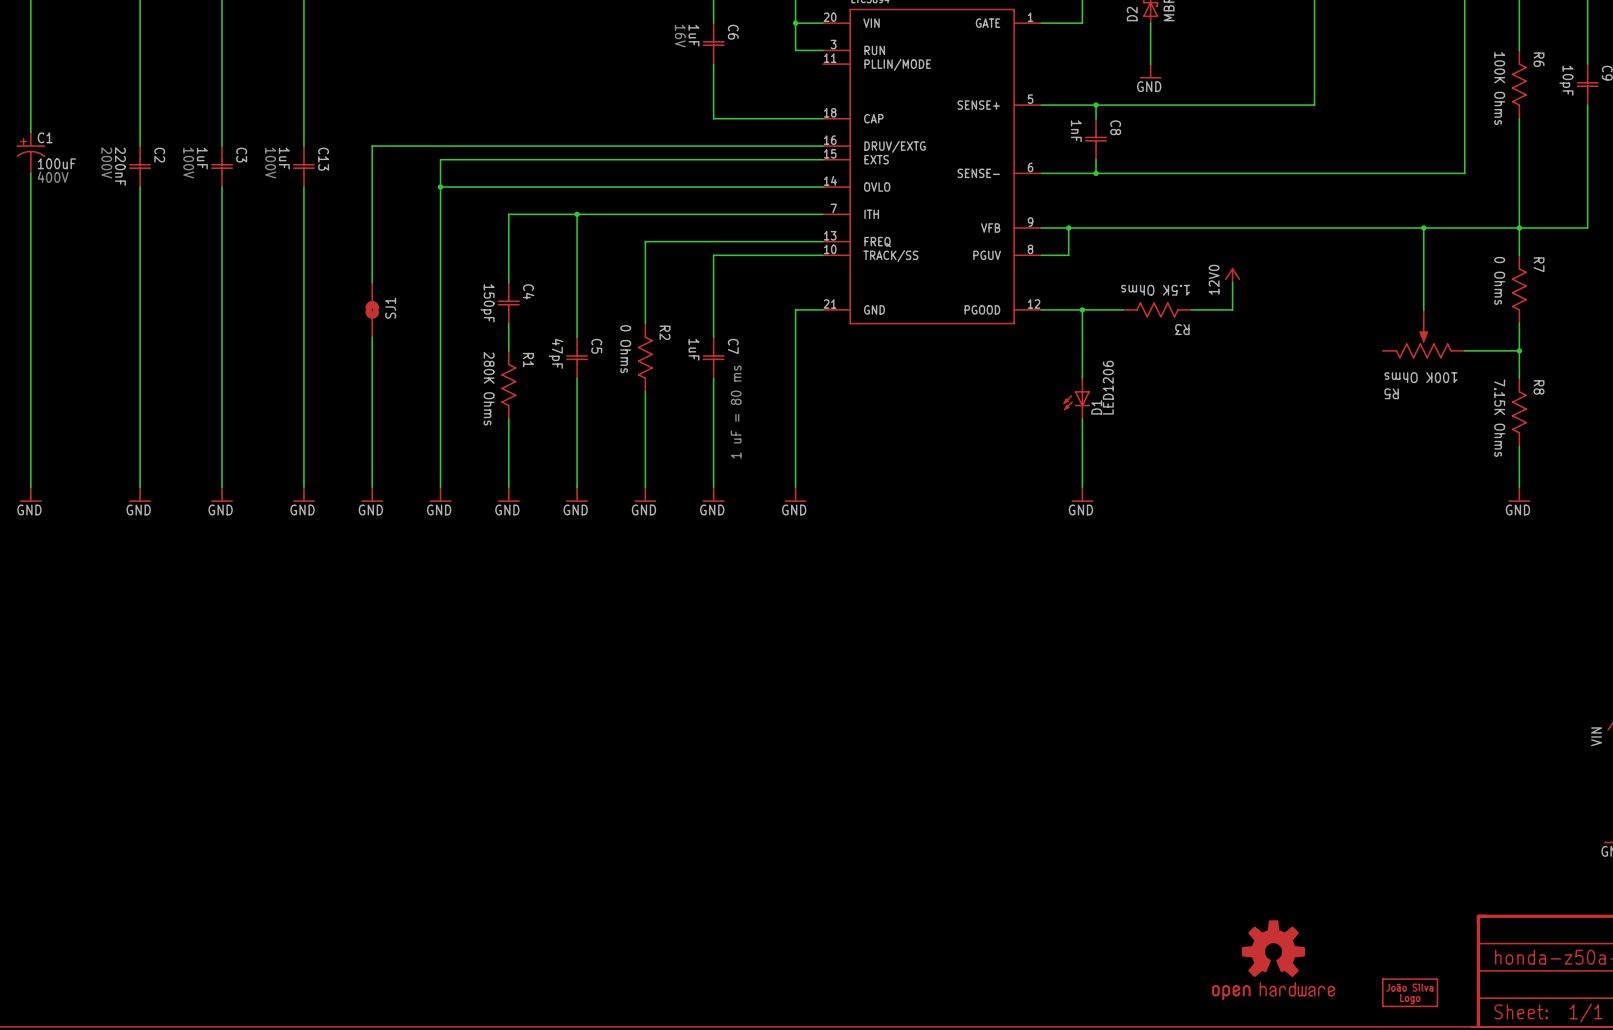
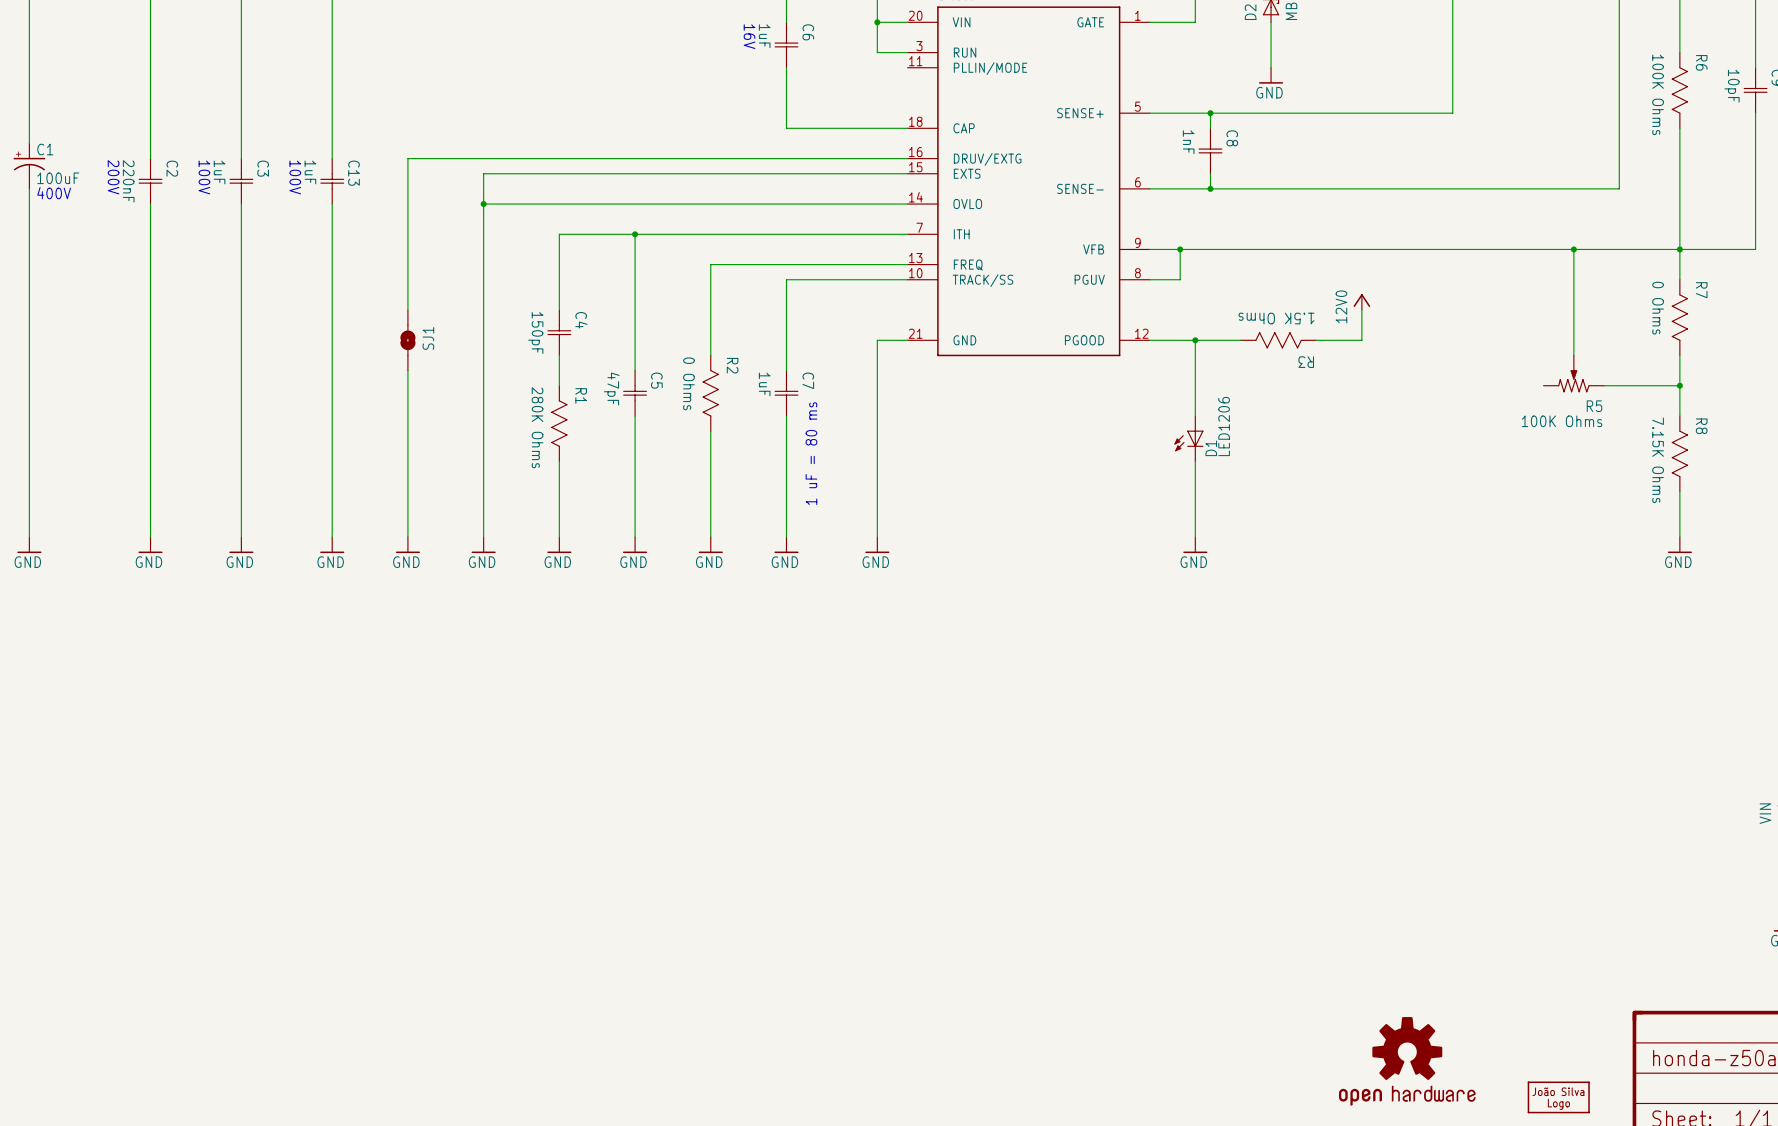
C1 symbol: [16, 132, 45, 174] -> [13, 143, 46, 189]
R5 symbol: [1382, 309, 1465, 359] -> [1543, 355, 1605, 393]
R5 value position: 100K Ohms (1420, 377) -> 100K Ohms (1562, 421)
R5 name position: R5 (1391, 393) -> R5 (1594, 406)

